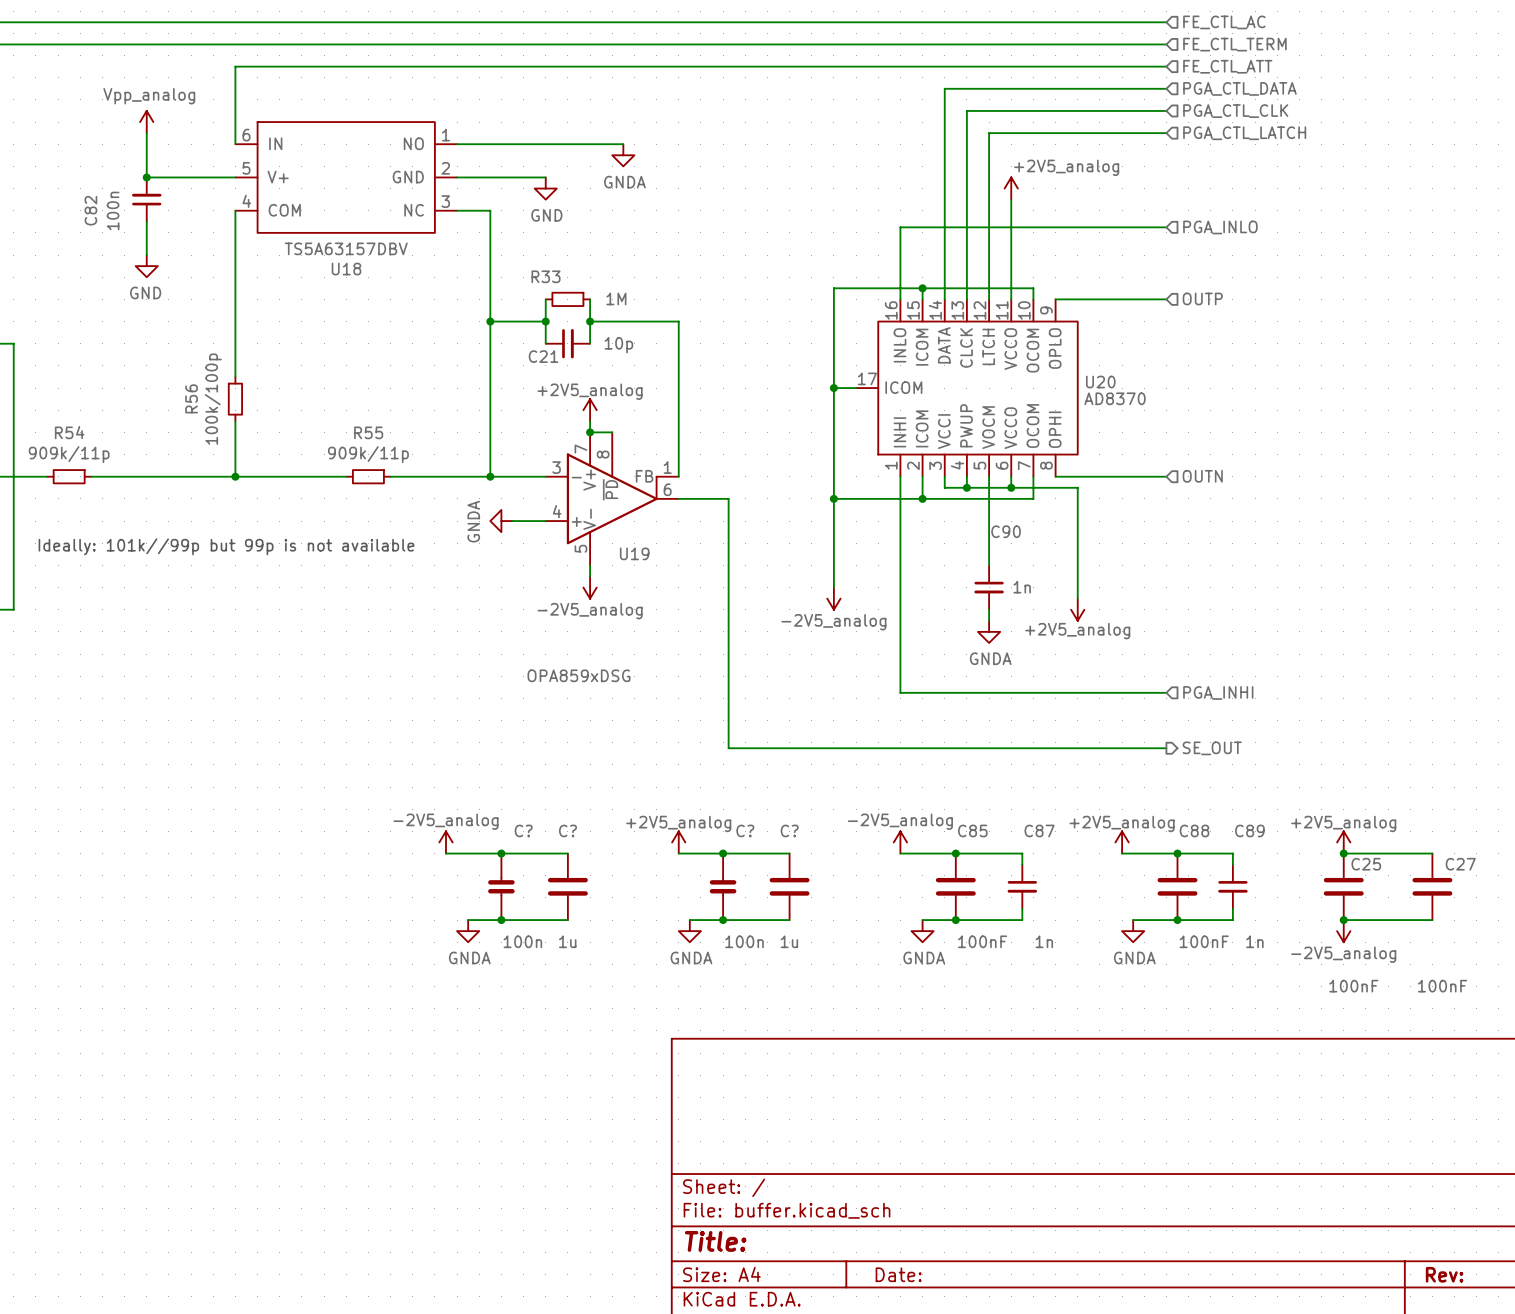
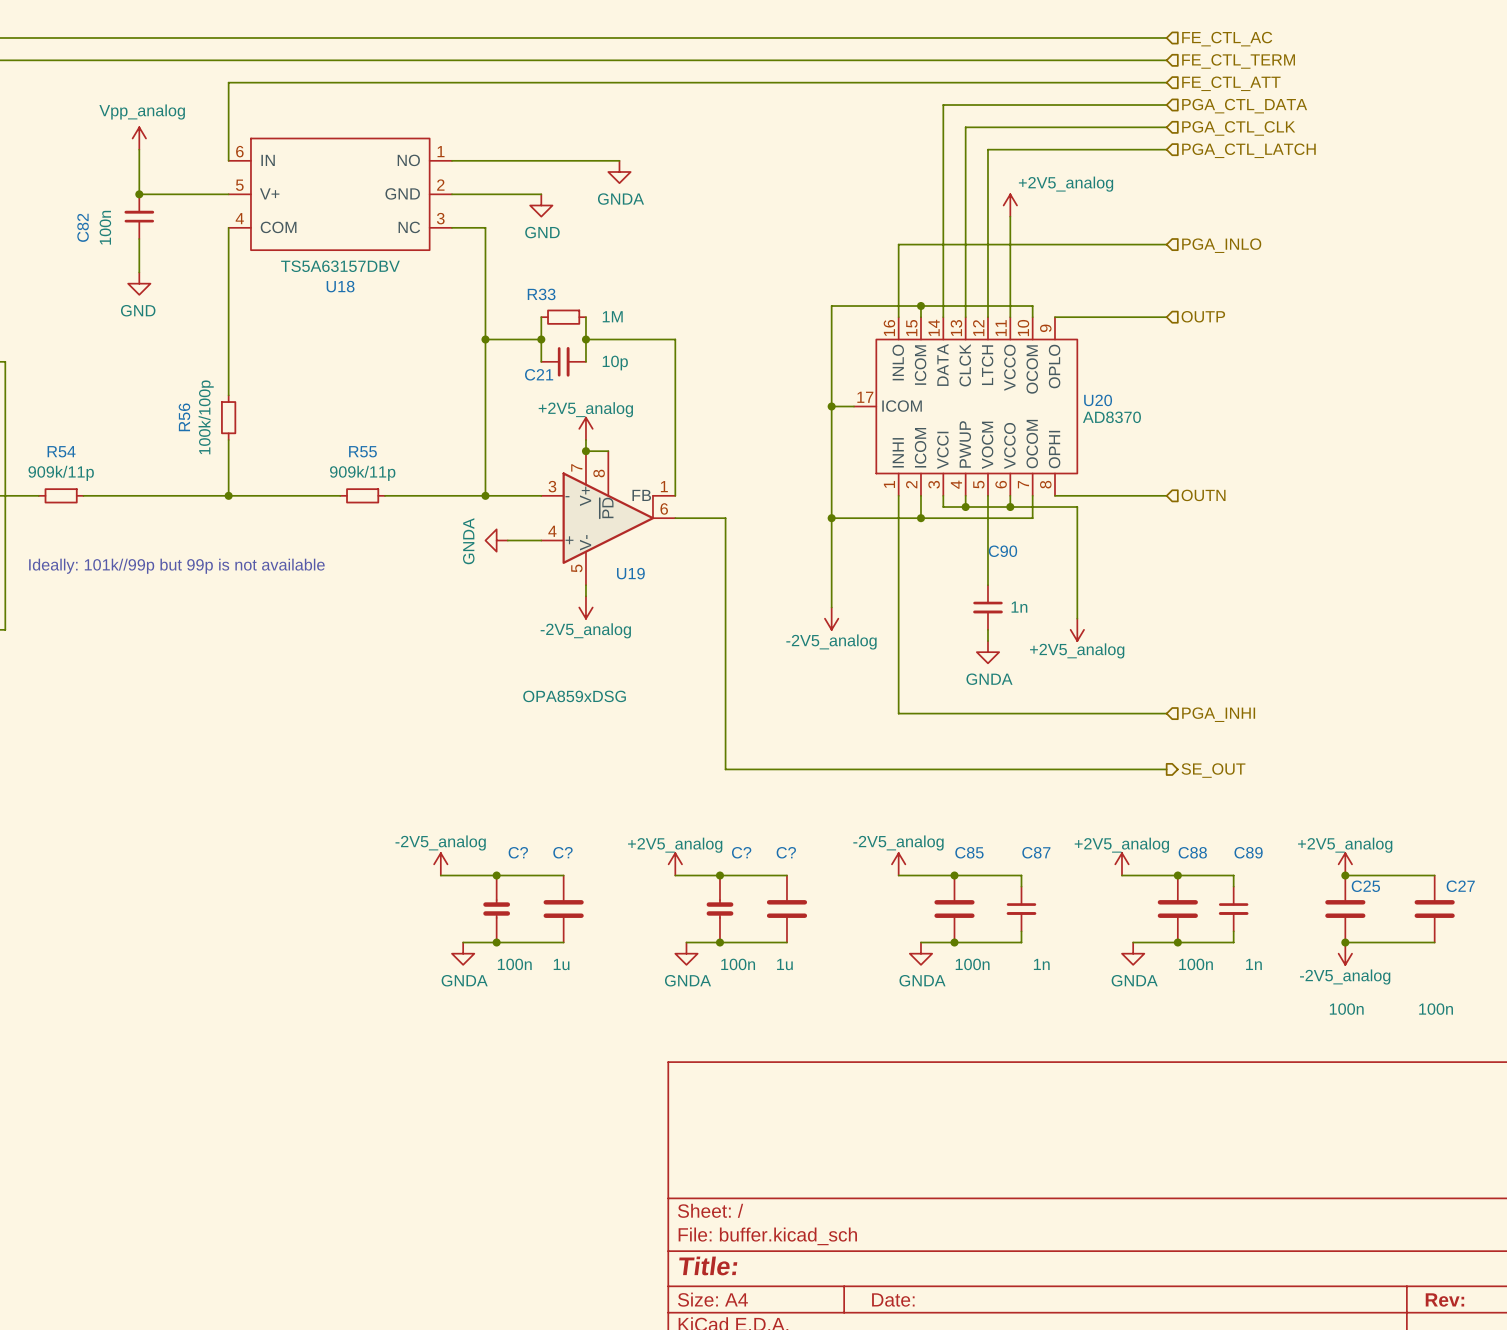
C85 value: 100nF (982, 941) -> 100n (972, 964)
C88 value: 100nF (1204, 941) -> 100n (1195, 964)
C25 value: 100nF (1353, 986) -> 100n (1346, 1009)
C27 value: 100nF (1442, 986) -> 100n (1436, 1009)

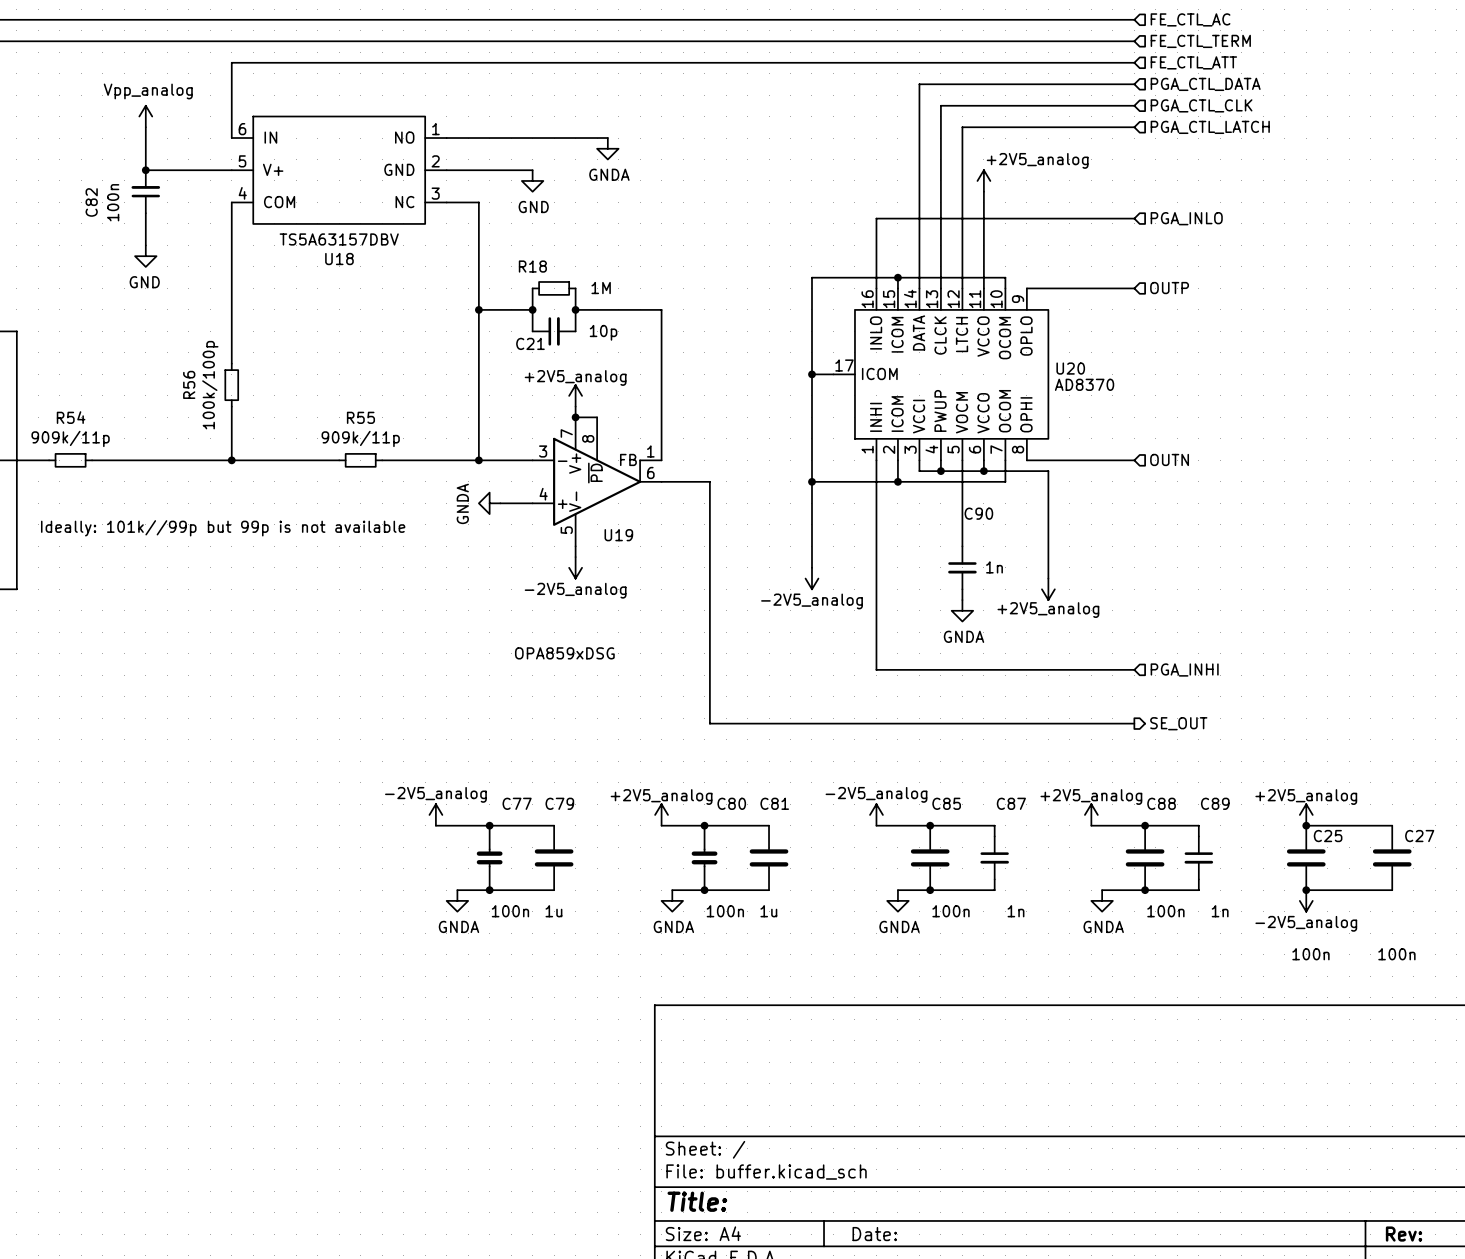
R33 name: R33 (541, 294) -> R18 (532, 266)
C? name: C? (518, 852) -> C77 (517, 803)
C? name: C? (562, 852) -> C79 (559, 803)
C? name: C? (741, 852) -> C80 (731, 803)
C? name: C? (786, 852) -> C81 (774, 803)

